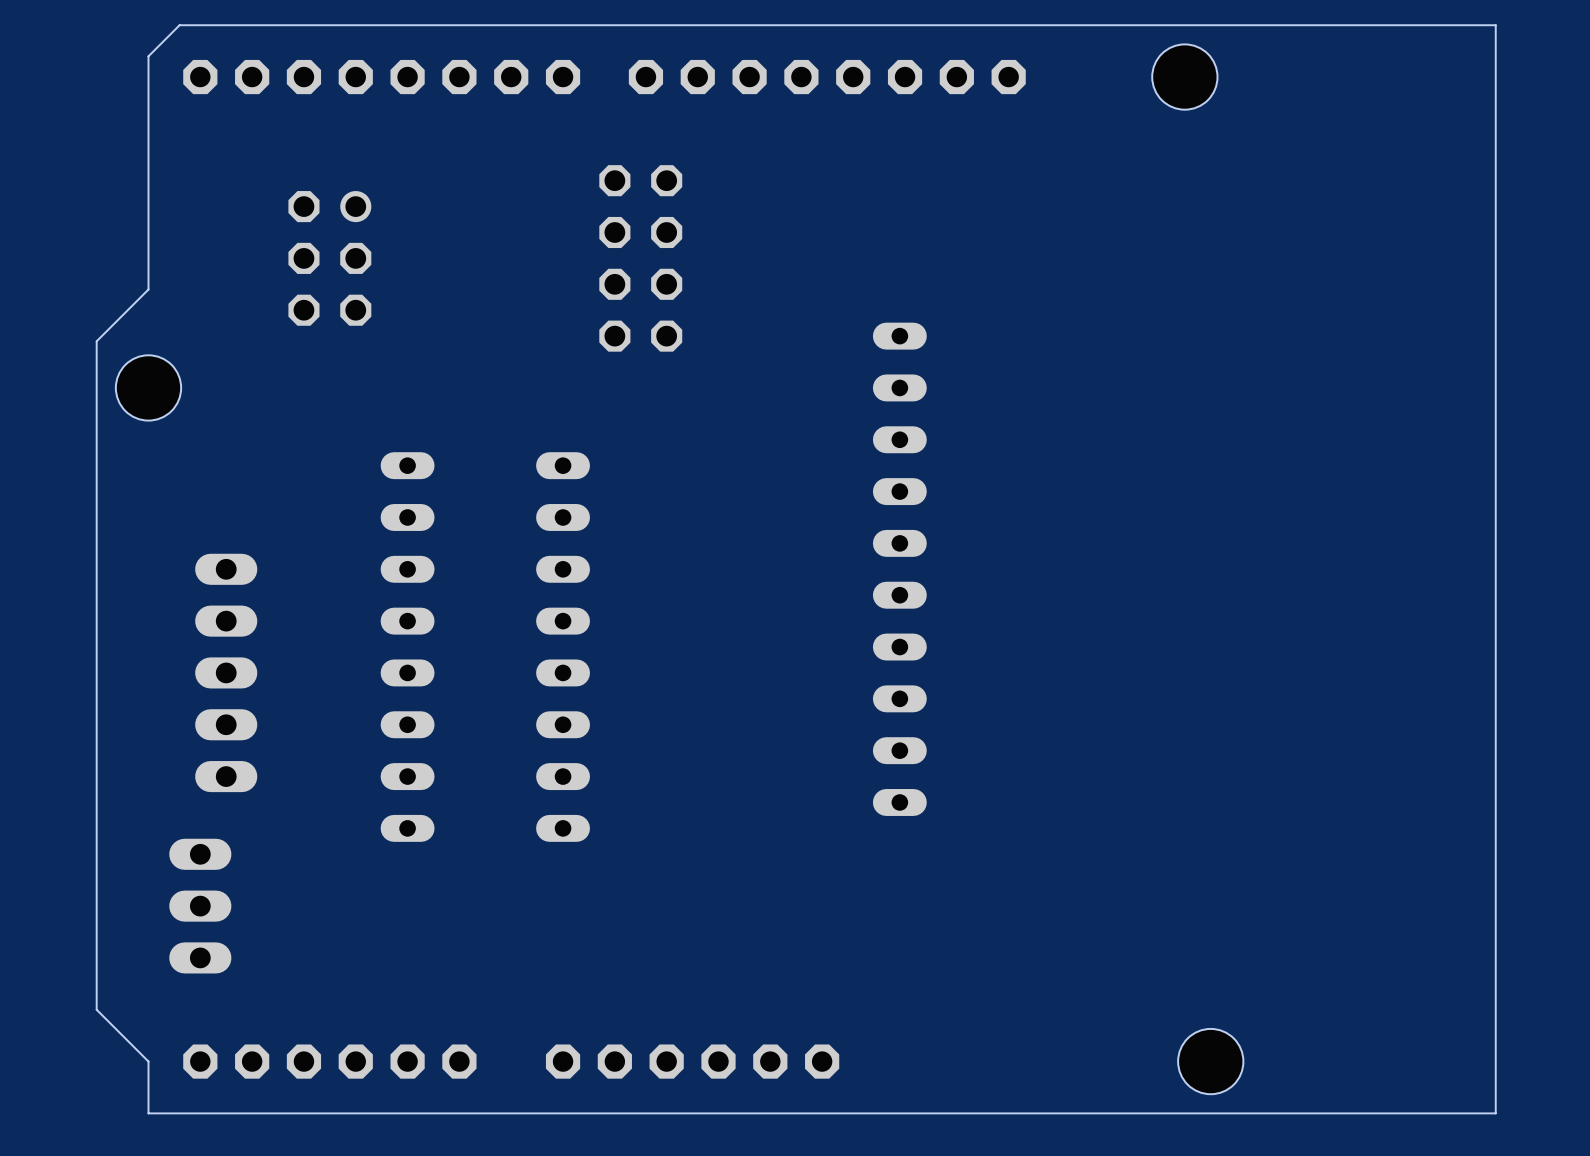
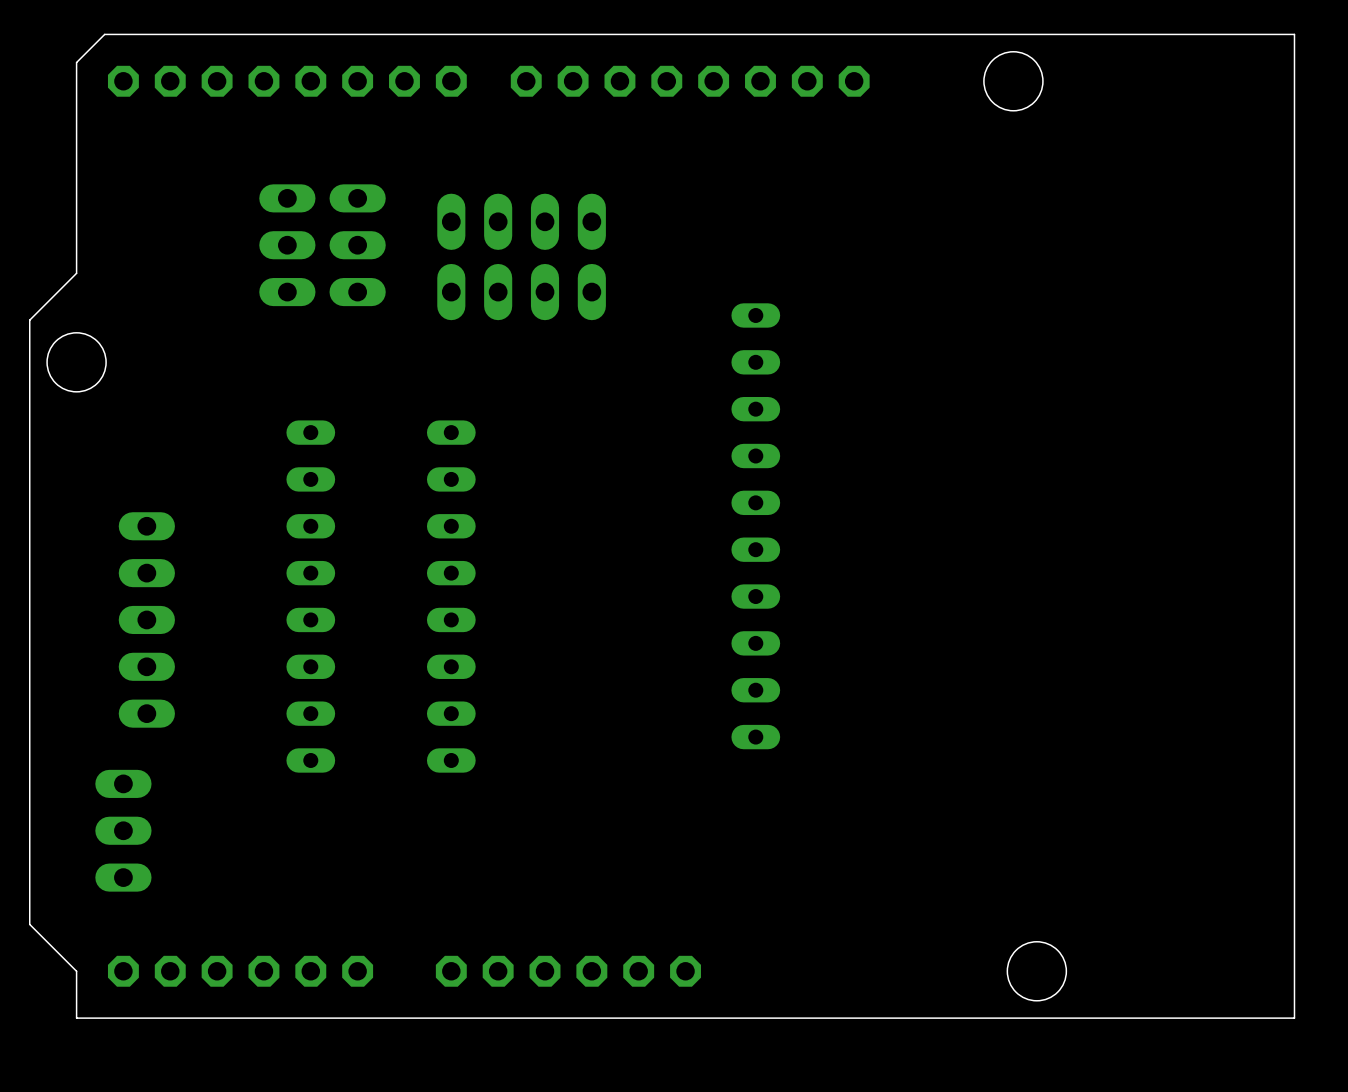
part: none -> (521, 221)
part: (329, 258) -> none
part: none -> (287, 245)
part: none -> (357, 245)
part: (640, 258) -> none
part: none -> (521, 292)

